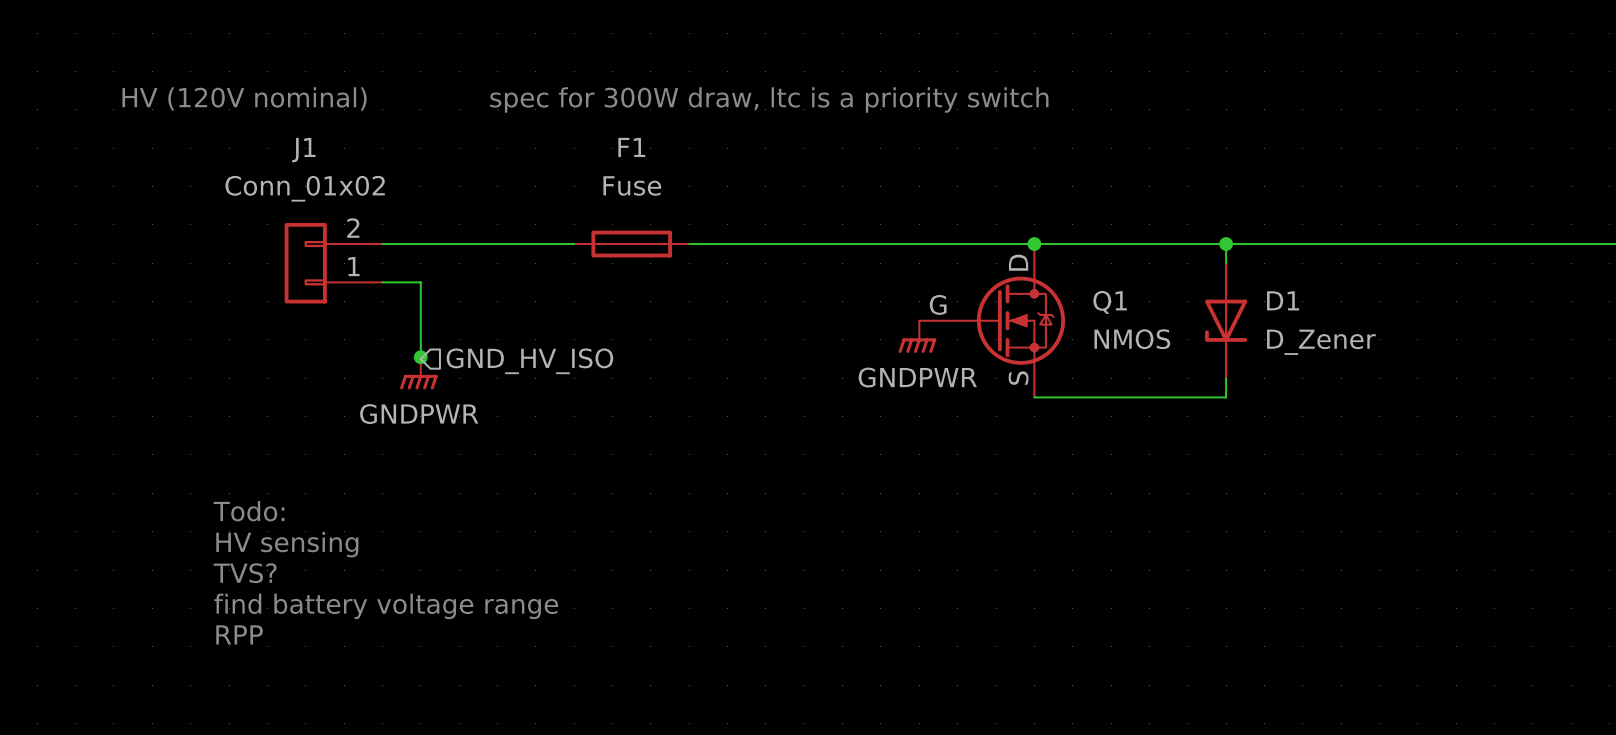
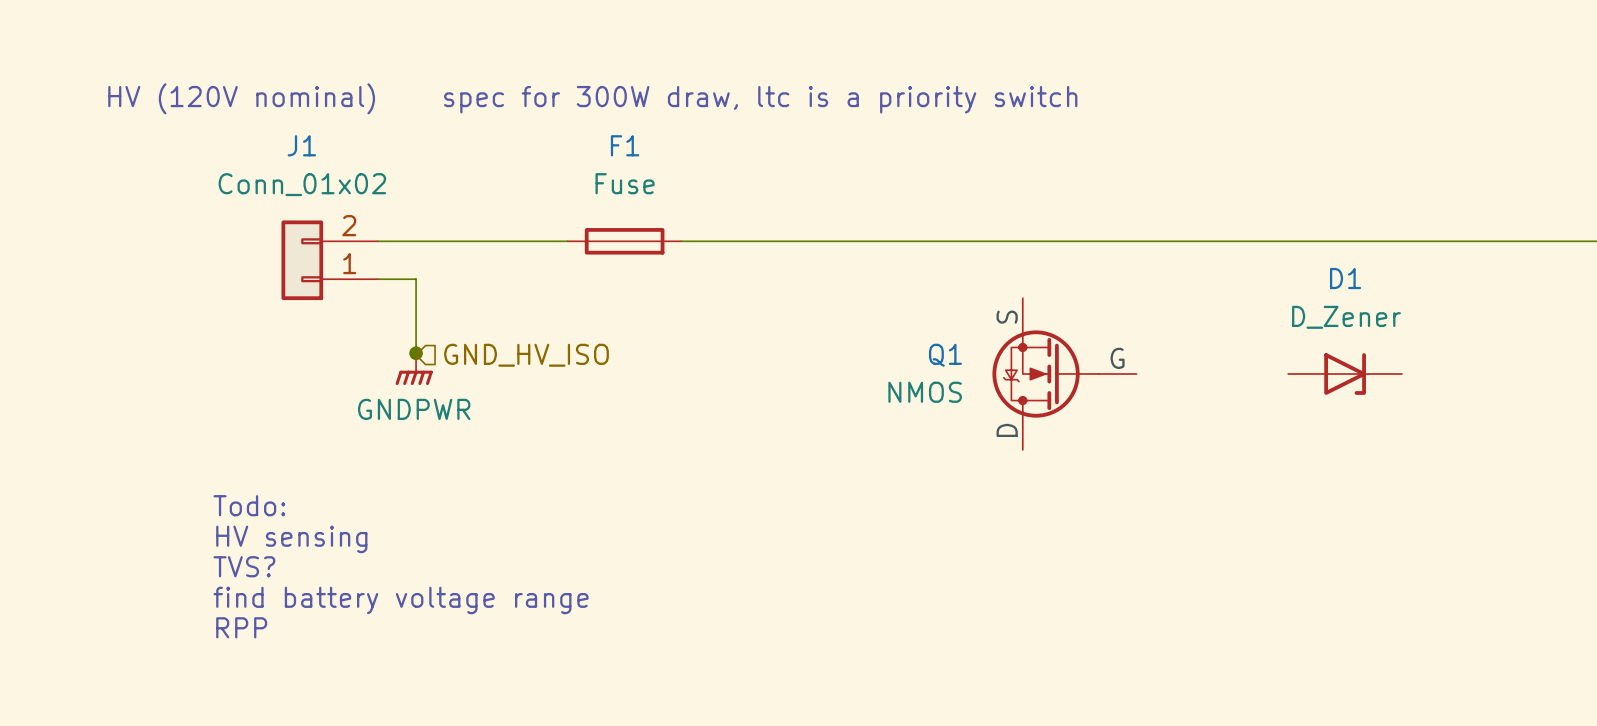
junction: (1034, 244) -> none
wire: (1226, 244) (1226, 263) -> none
junction: (1226, 244) -> none
D1 name position: D1 (1283, 300) -> D1 (1345, 278)
Q1 name position: Q1 (1110, 302) -> Q1 (945, 355)
Q1 position: (992, 320) -> (1064, 374)
Q1 rotation: 0° (1011, 320) -> 180° (1045, 374)
D1 rotation: 0° (1226, 320) -> 90° counterclockwise (1345, 374)
D1 position: (1226, 320) -> (1345, 374)
power symbol: GNDPWR (917, 336) -> none
Q1 value position: NMOS (1132, 339) -> NMOS (925, 392)
D1 value position: D_Zener (1321, 342) -> D_Zener (1346, 317)
wire: (1226, 378) (1226, 397) (1034, 397) -> none

